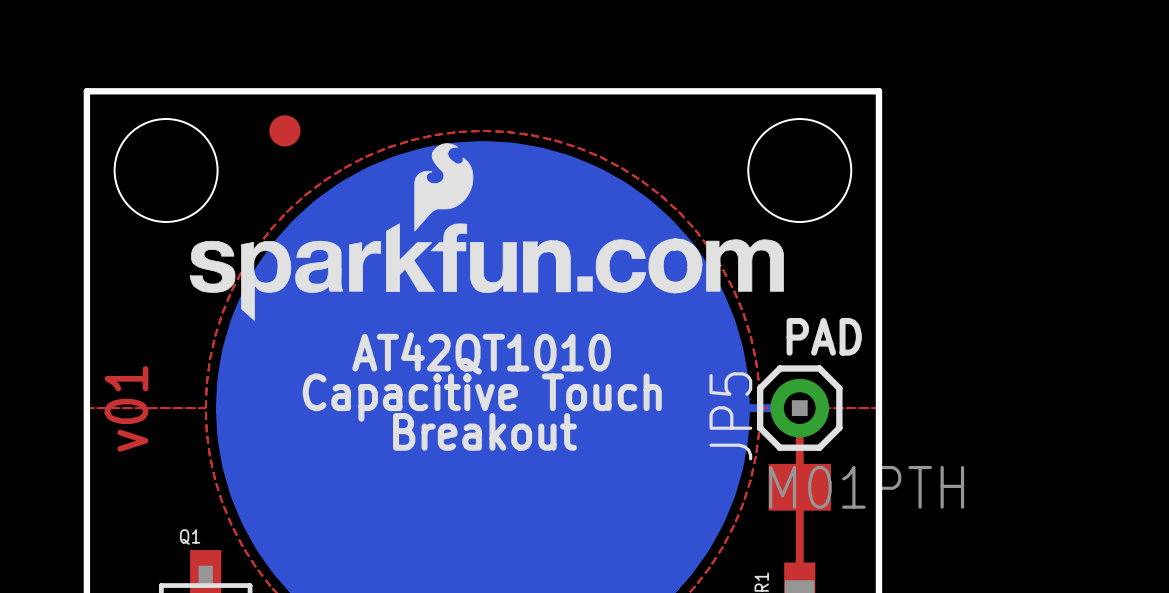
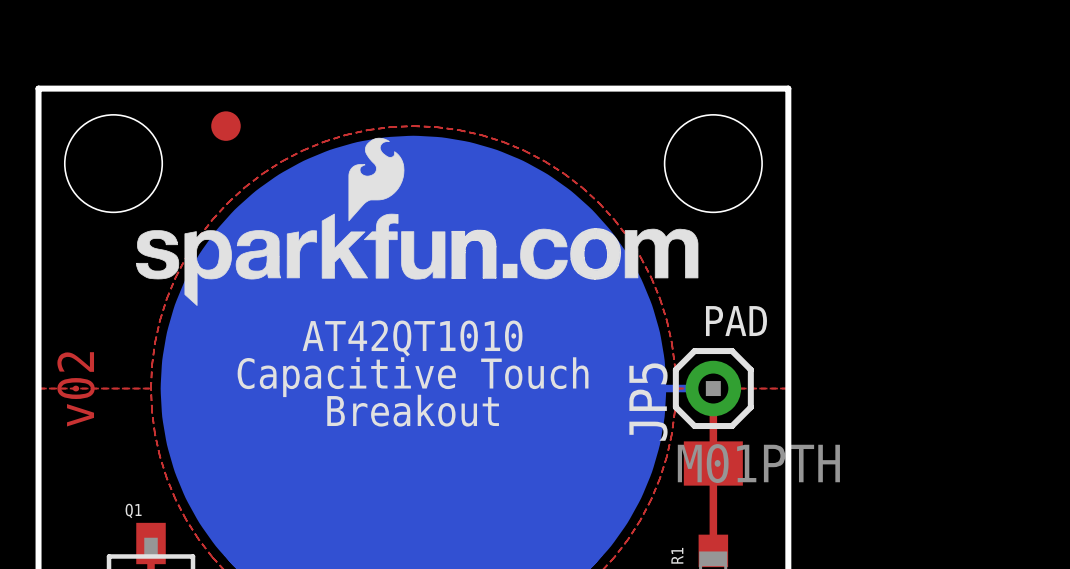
text: v01 (126, 408) -> v02 (76, 389)

